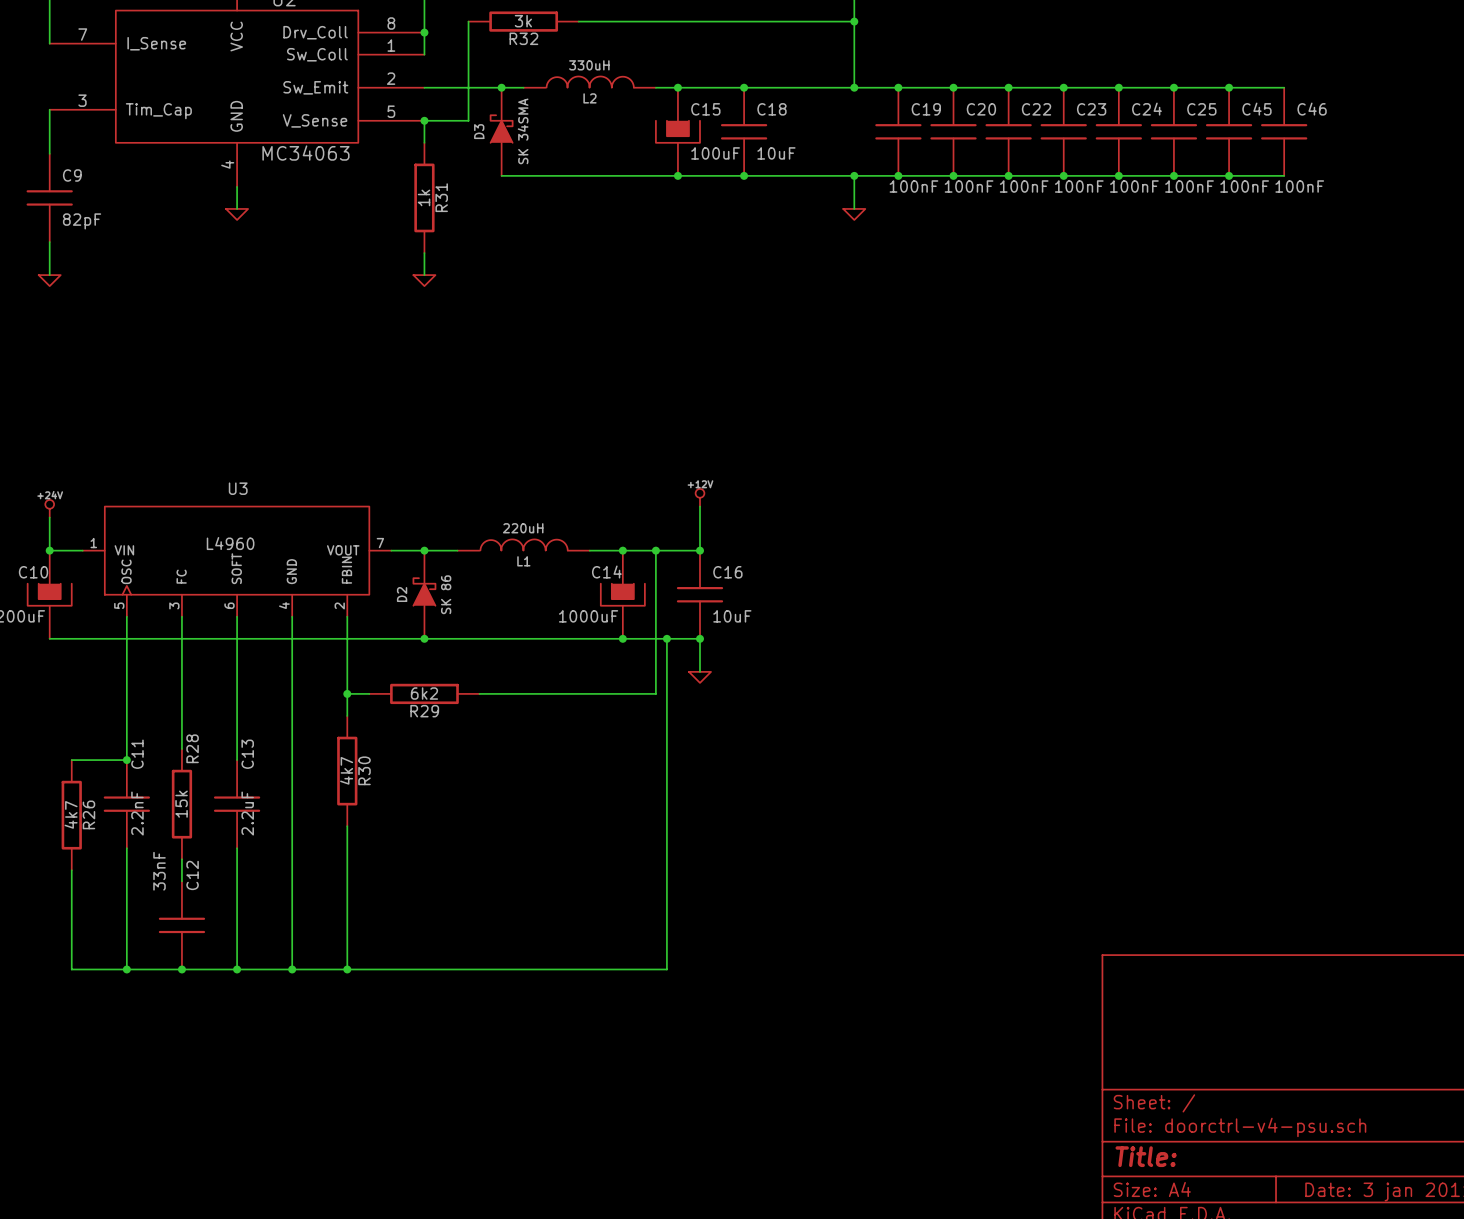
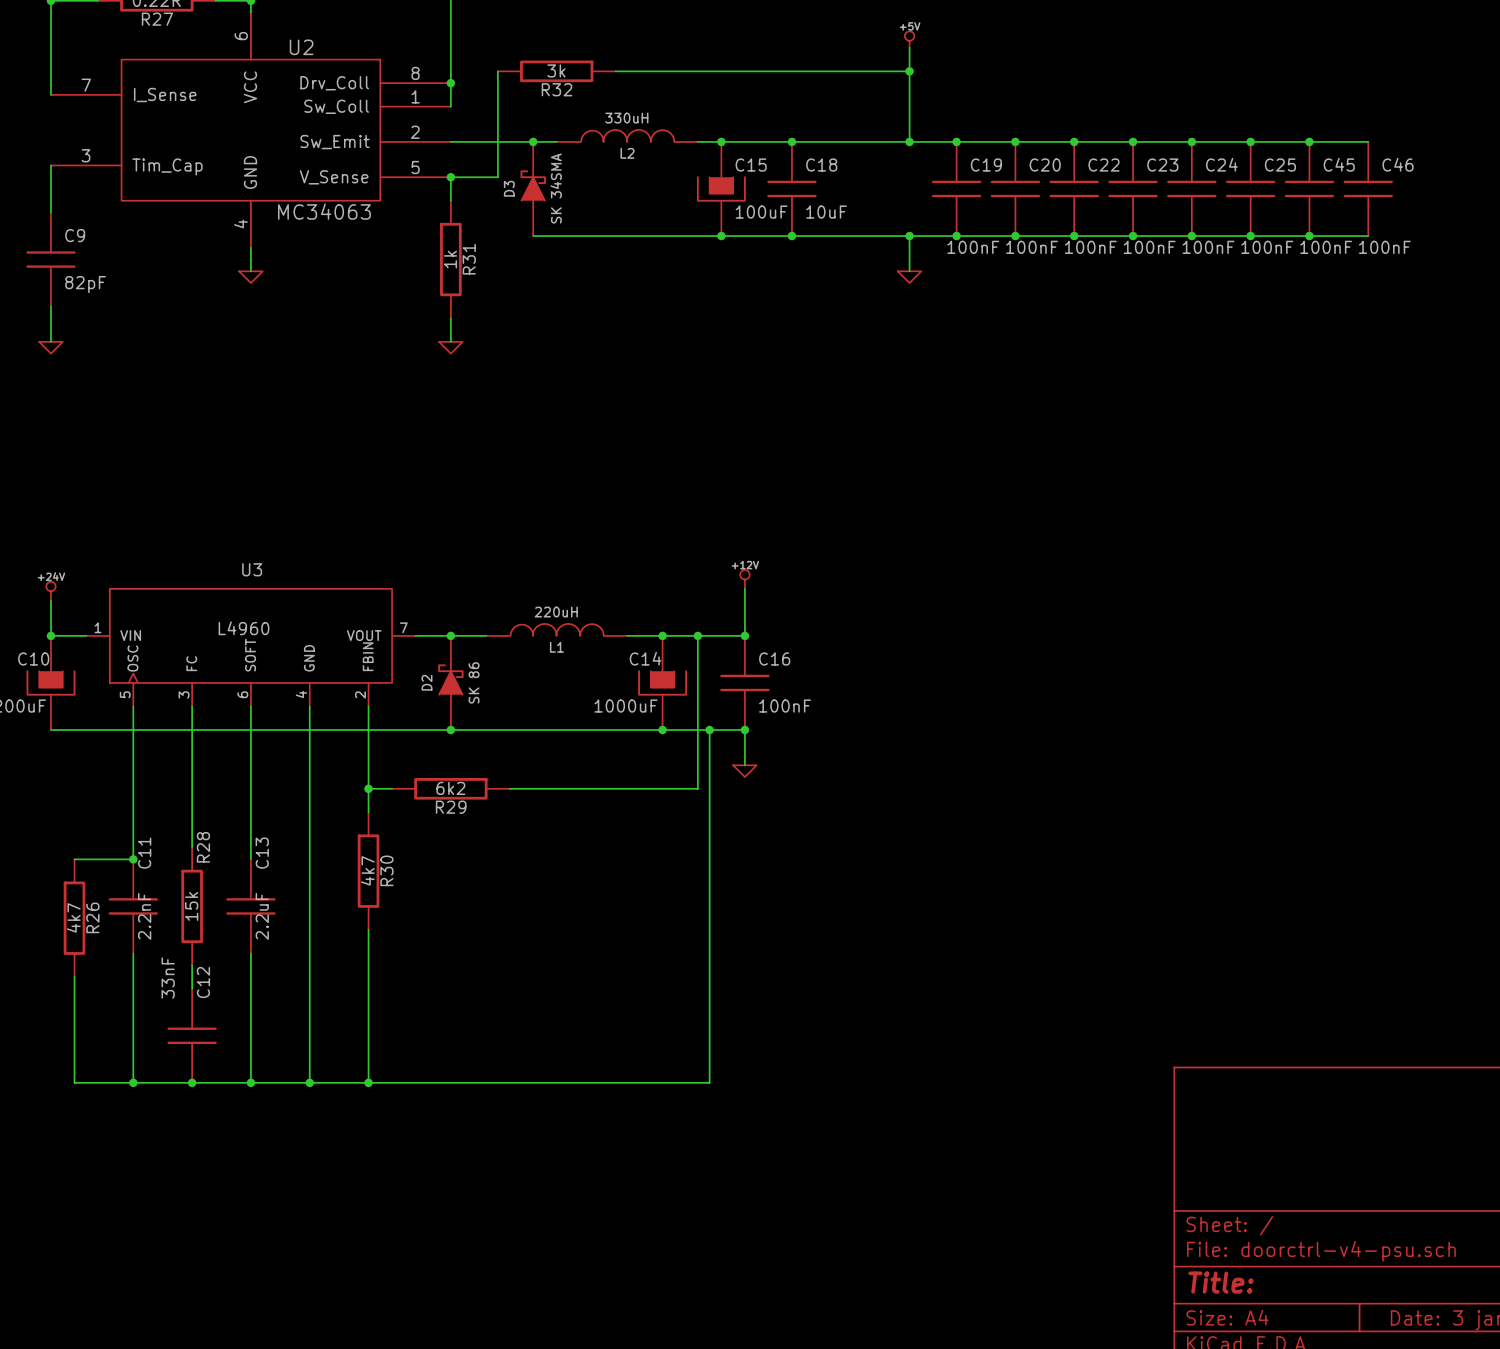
C16 value: 10uF (732, 616) -> 100nF (785, 706)

